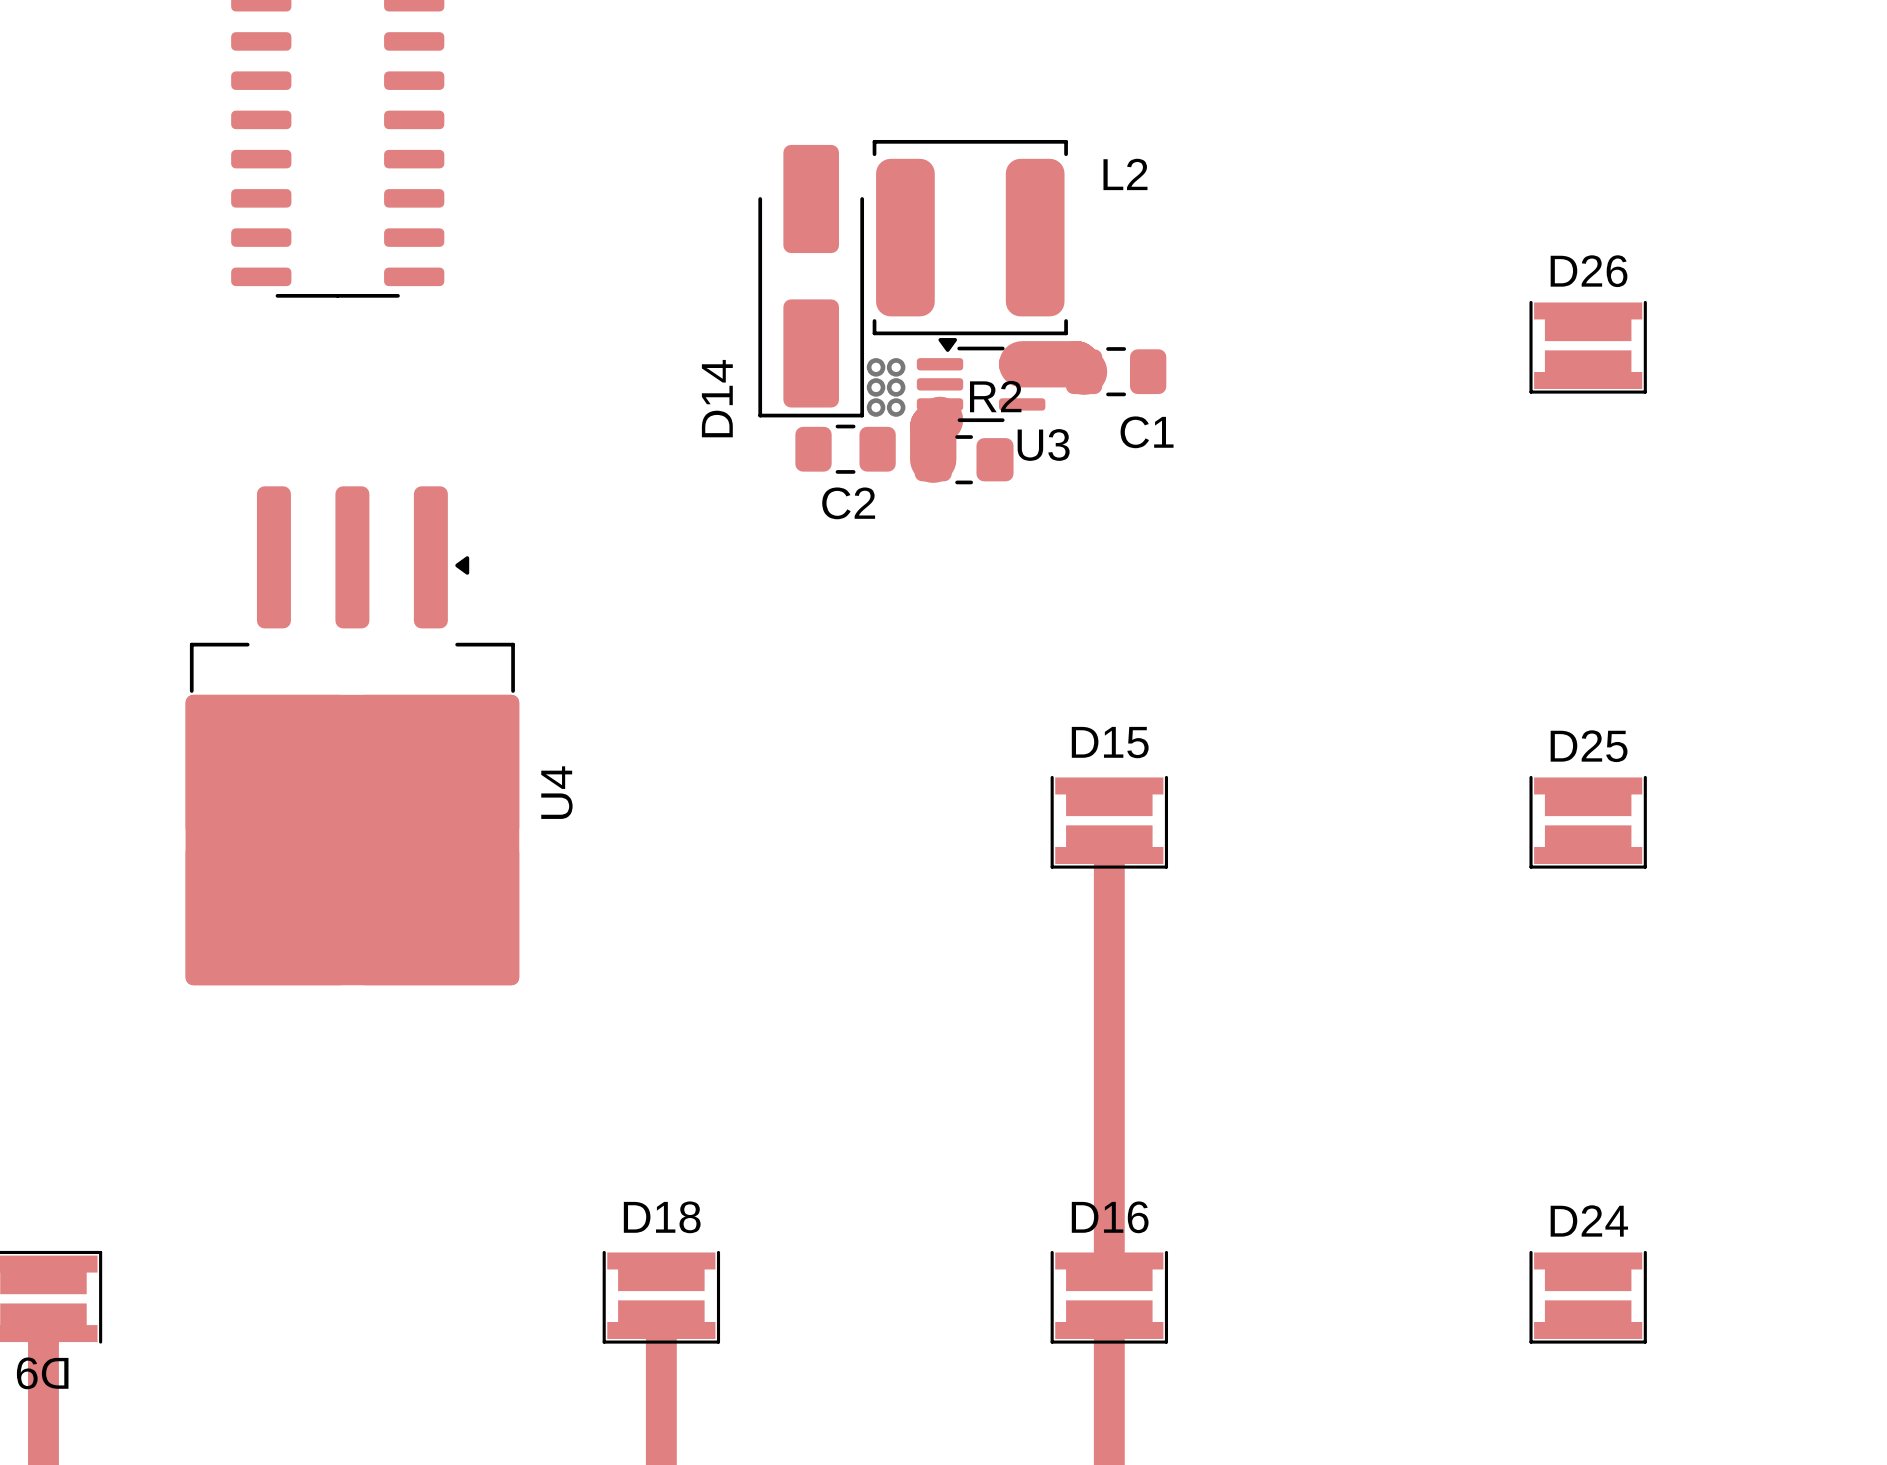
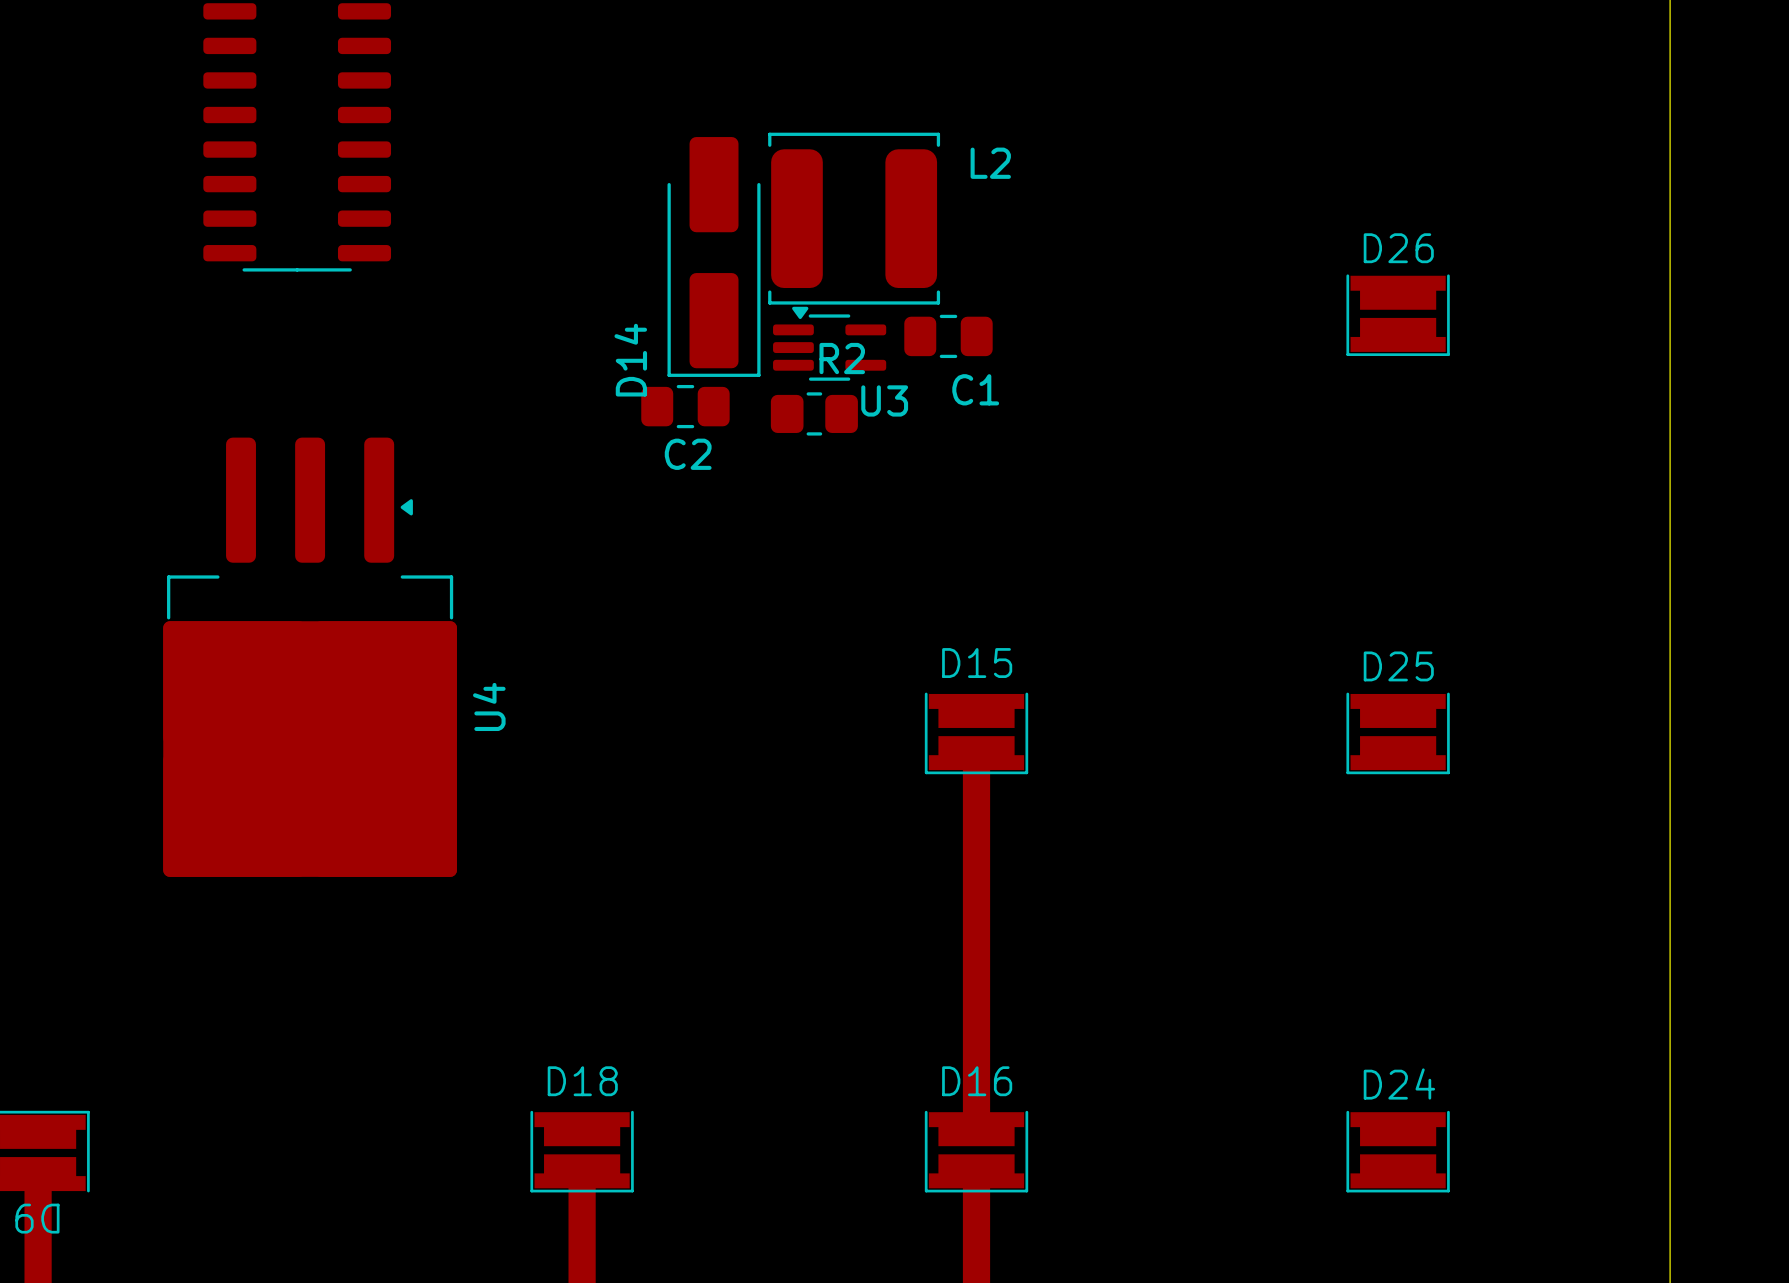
top track: (1022, 364) (1076, 364) (1084, 371) -> none
via: (876, 367) -> none
via: (896, 367) -> none
C1 position: (1116, 371) -> (948, 336)
U3 position: (981, 380) -> (829, 343)
via: (876, 387) -> none
via: (896, 387) -> none
via: (876, 407) -> none
via: (896, 407) -> none
top track: (940, 419) (933, 426) (933, 459) -> none
C2 position: (845, 449) -> (685, 406)
R2 position: (964, 459) -> (814, 413)

